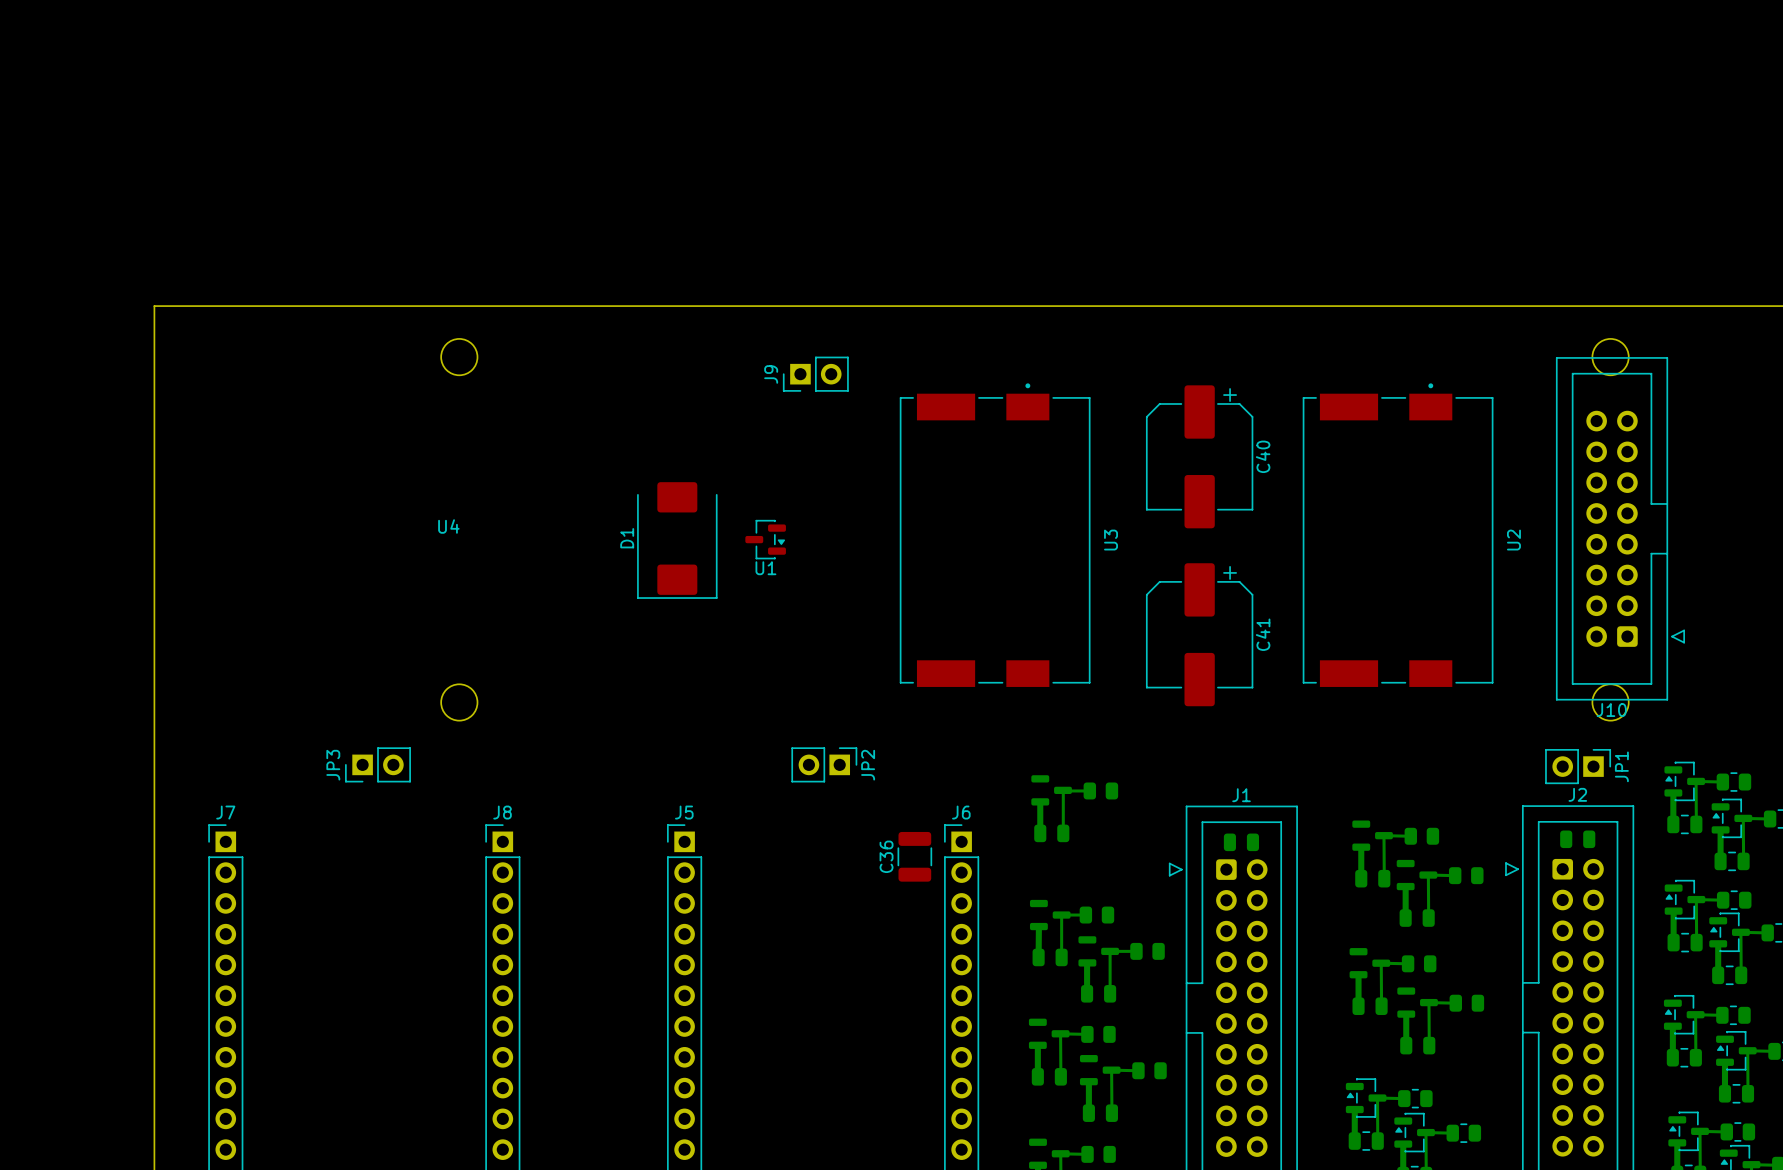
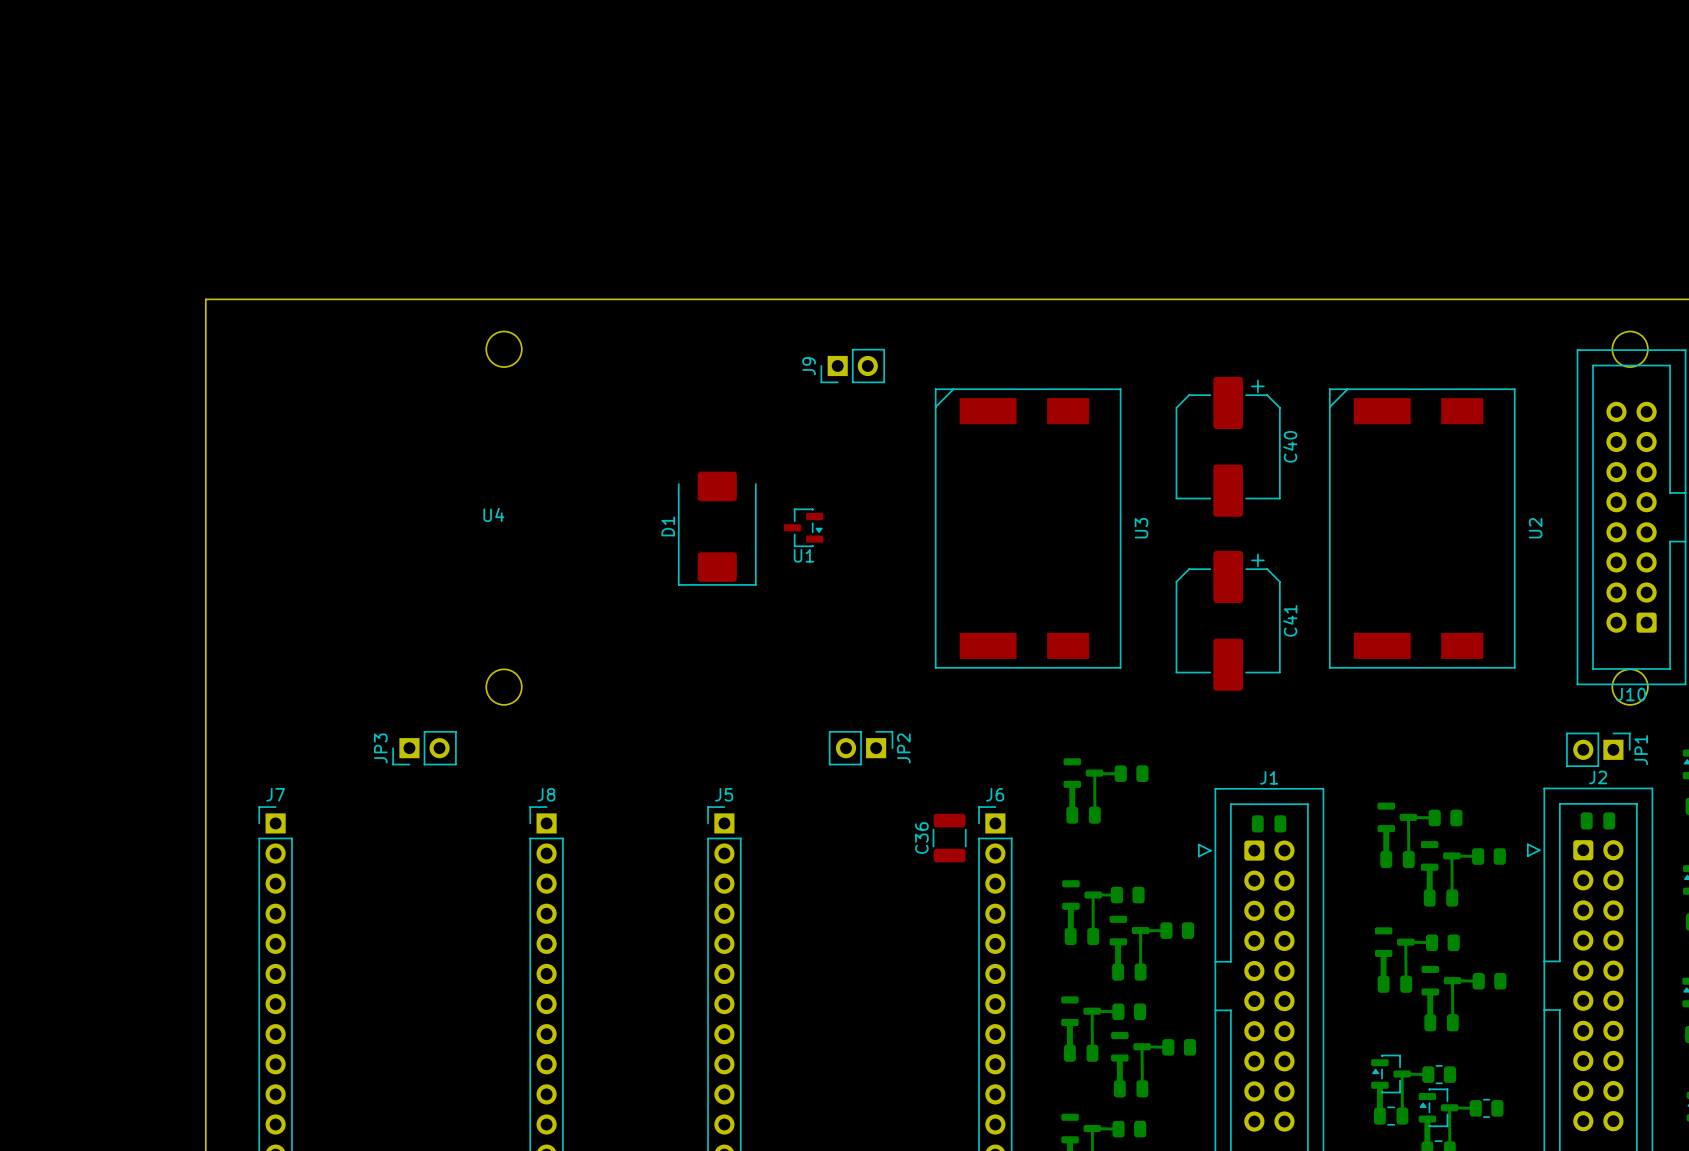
U3 footprint: [899, 383, 1091, 687] -> [934, 388, 1122, 669]
U2 footprint: [1302, 383, 1494, 687] -> [1329, 388, 1516, 669]

